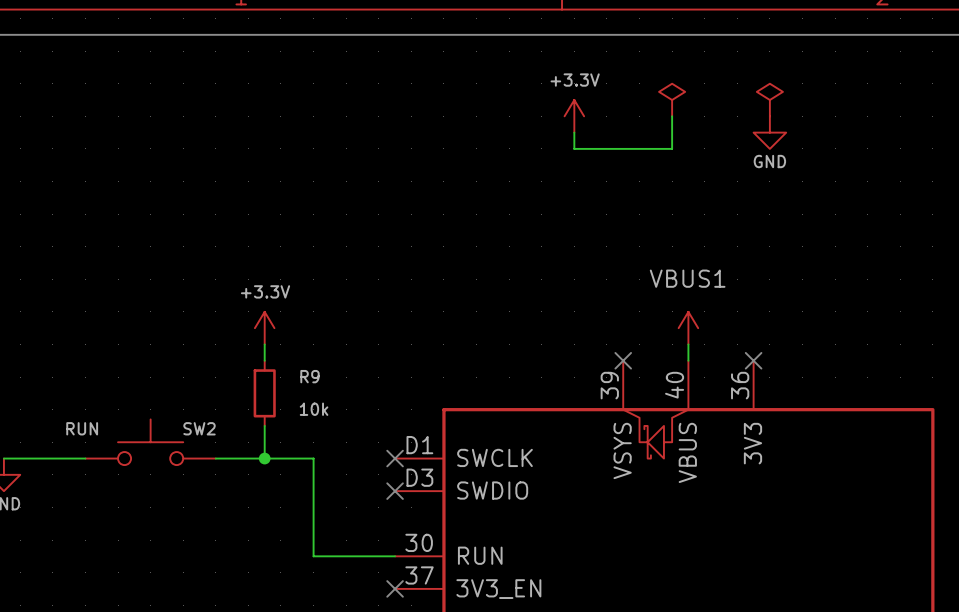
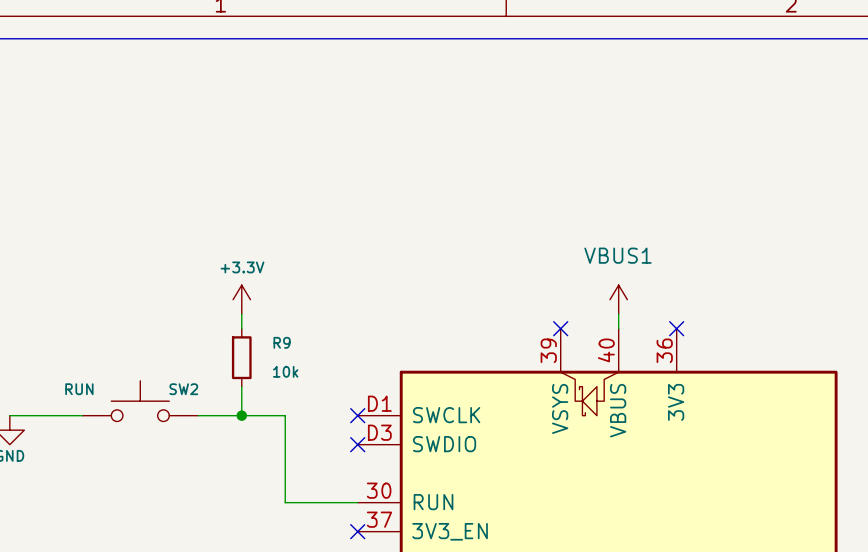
power symbol: (672, 100) -> none
power symbol: (769, 100) -> none
power symbol: +3.3V (574, 116) -> none
wire: (672, 116) (672, 148) (574, 148) (574, 132) -> none
power symbol: GND (769, 132) -> none

